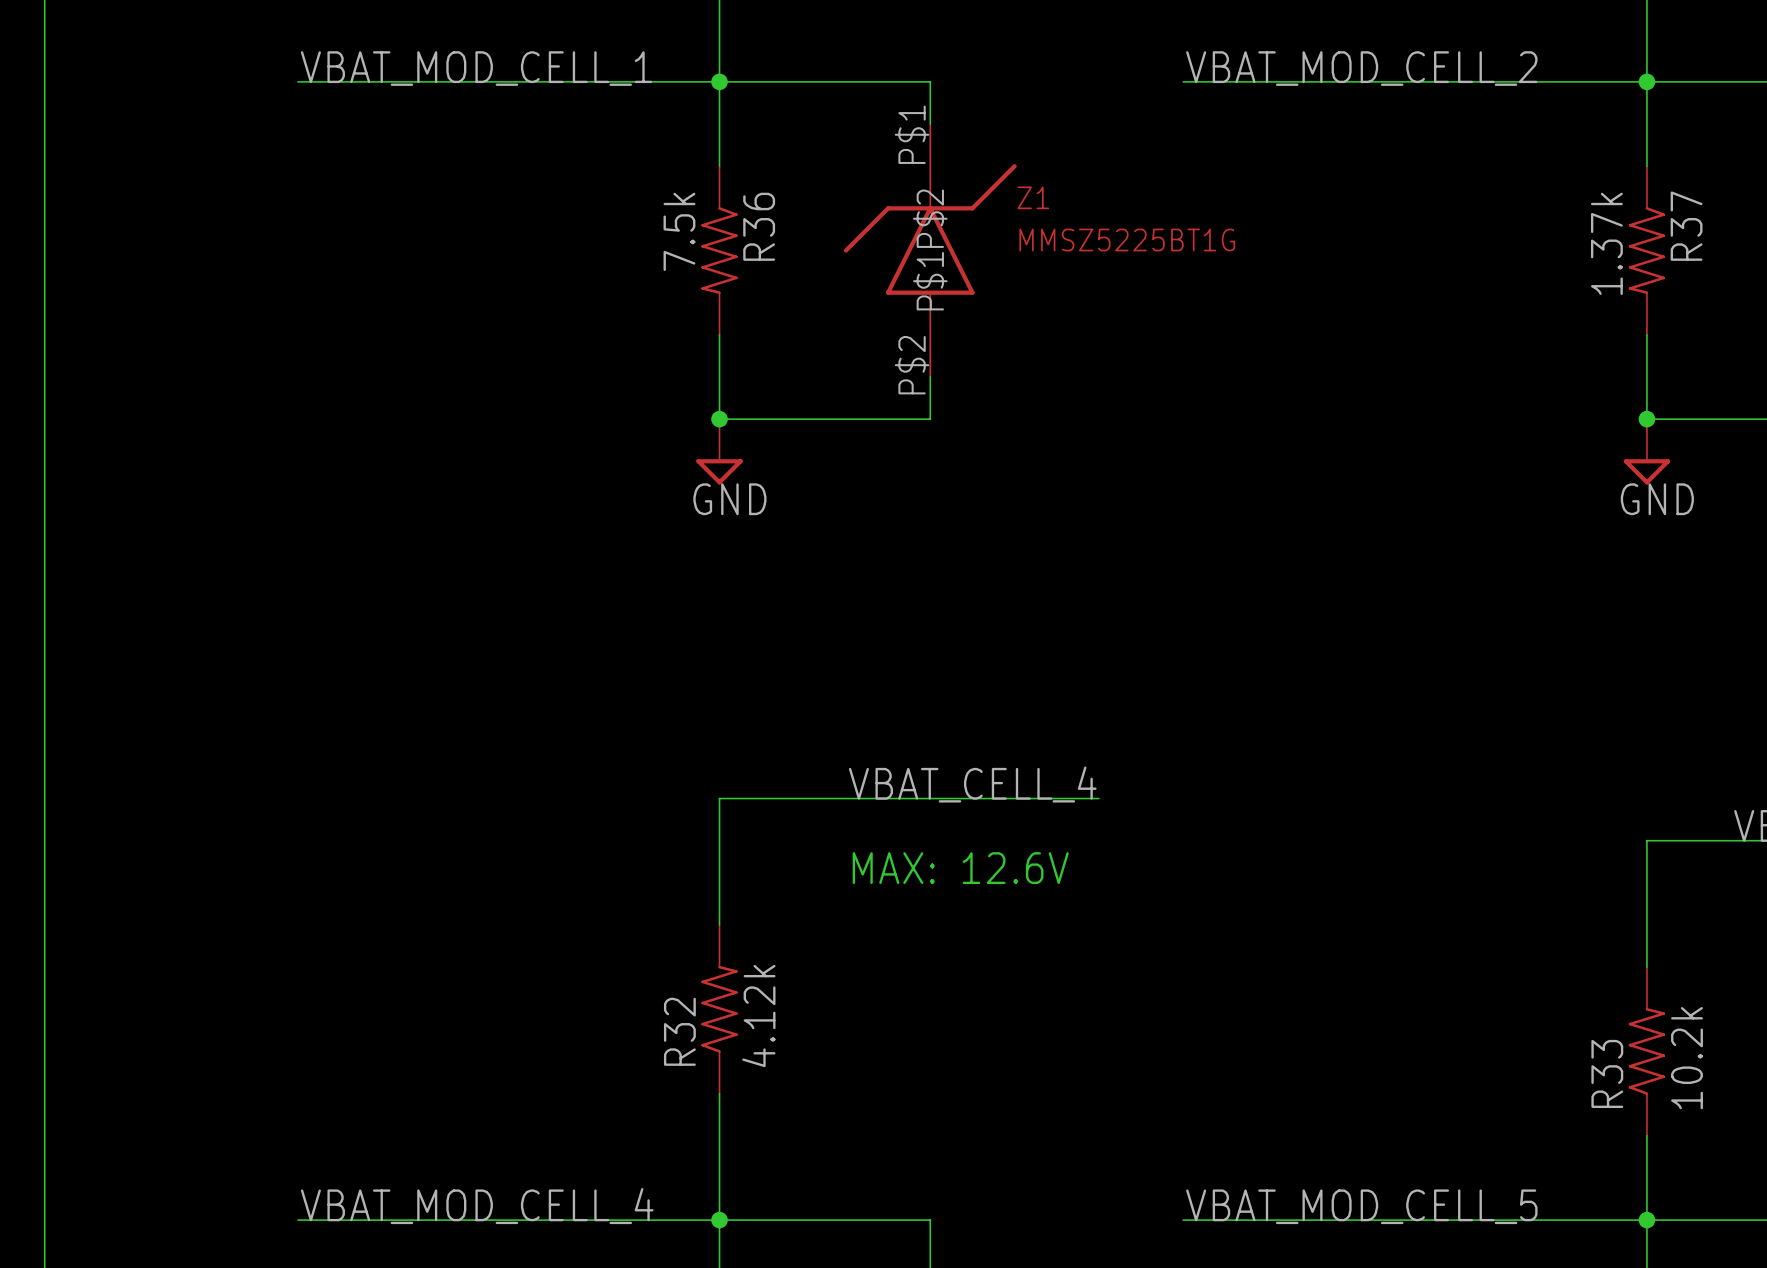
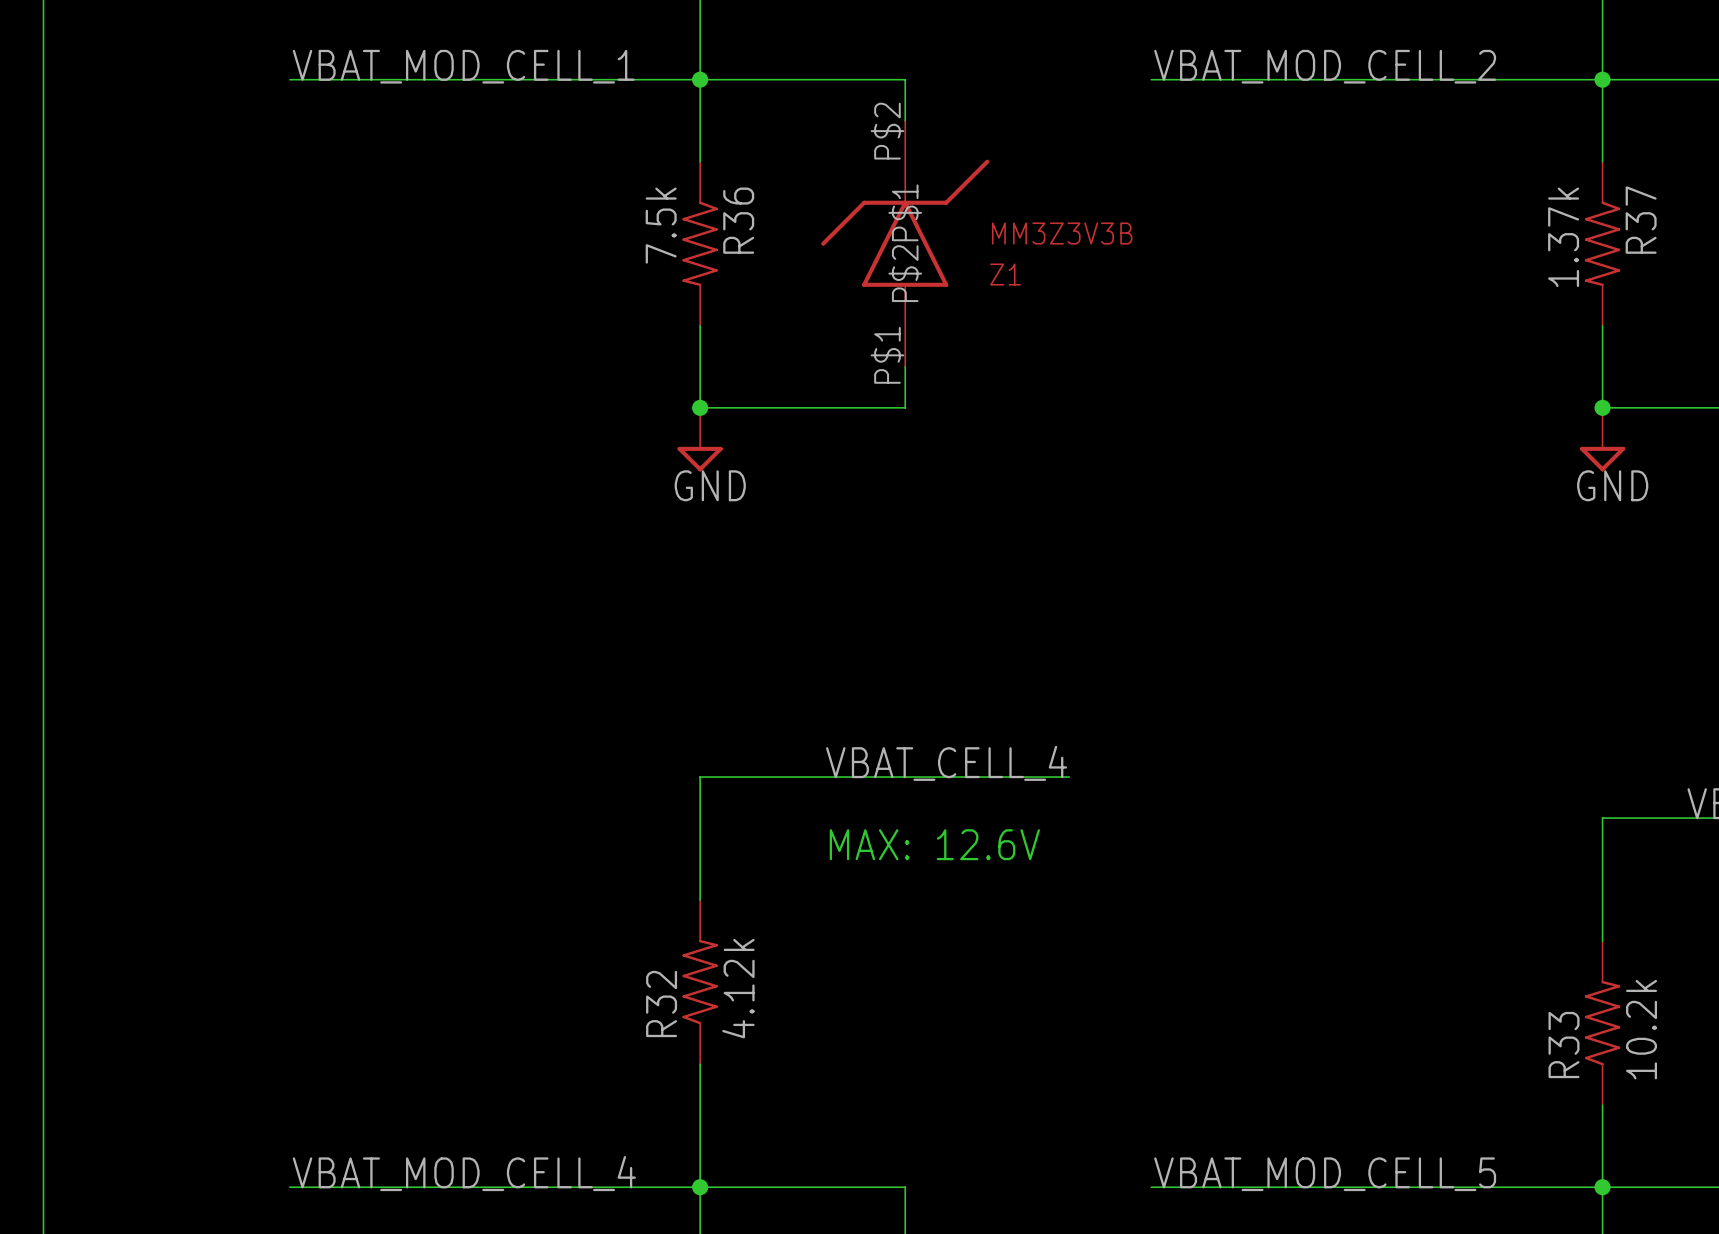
Z1 pin number: P$1 (912, 134) -> P$2 (887, 131)
Z1 name position: Z1 (1033, 197) -> Z1 (1005, 274)
Z1 pin name: P$2 (930, 218) -> P$1 (905, 212)
Z1 value: MMSZ5225BT1G (1127, 239) -> MM3Z3V3B (1062, 233)
Z1 pin name: P$1 (930, 281) -> P$2 (905, 273)
Z1 pin number: P$2 (912, 365) -> P$1 (887, 355)

